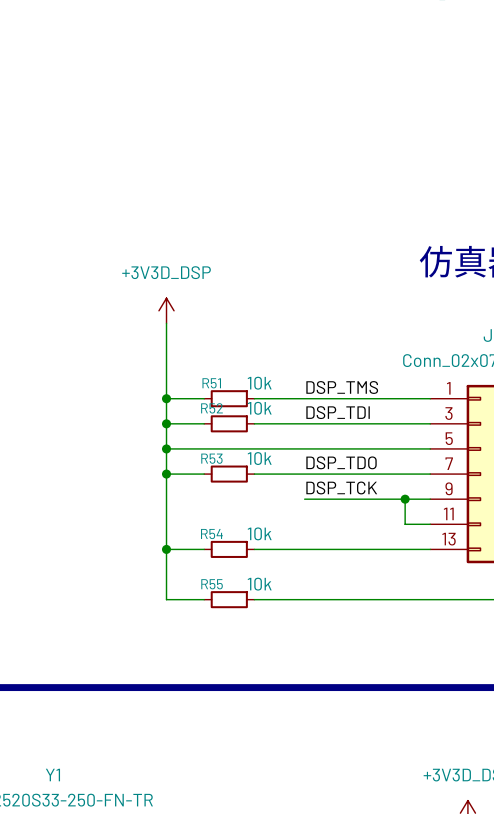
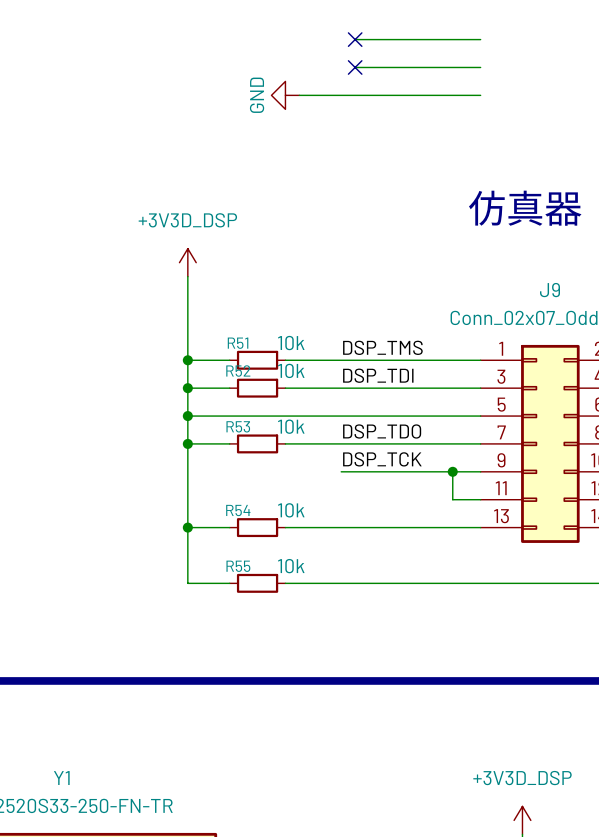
wire: none -> (355, 39) (480, 39)
no-connect mark: none -> (355, 39)
wire: none -> (355, 67) (480, 67)
no-connect mark: none -> (355, 67)
power symbol: none -> GND (285, 95)
wire: none -> (299, 95) (480, 95)

